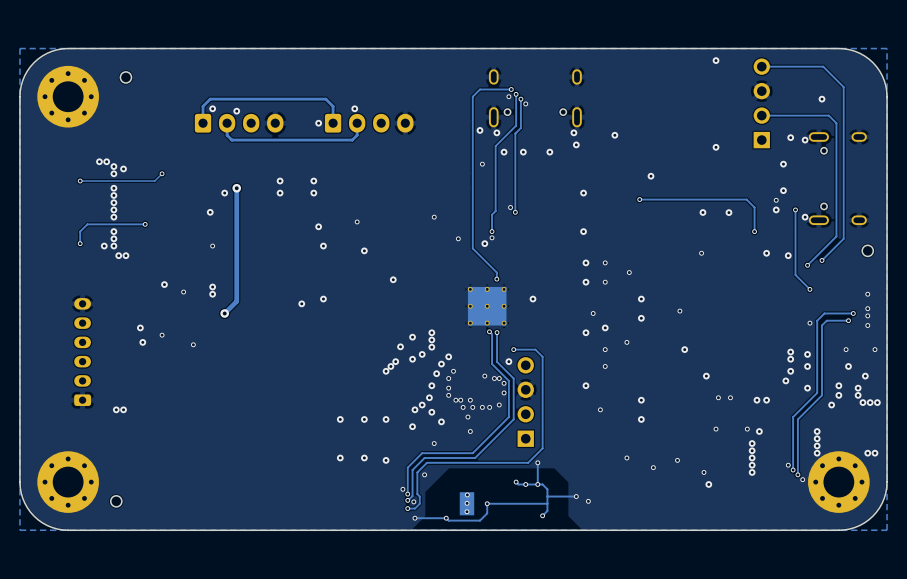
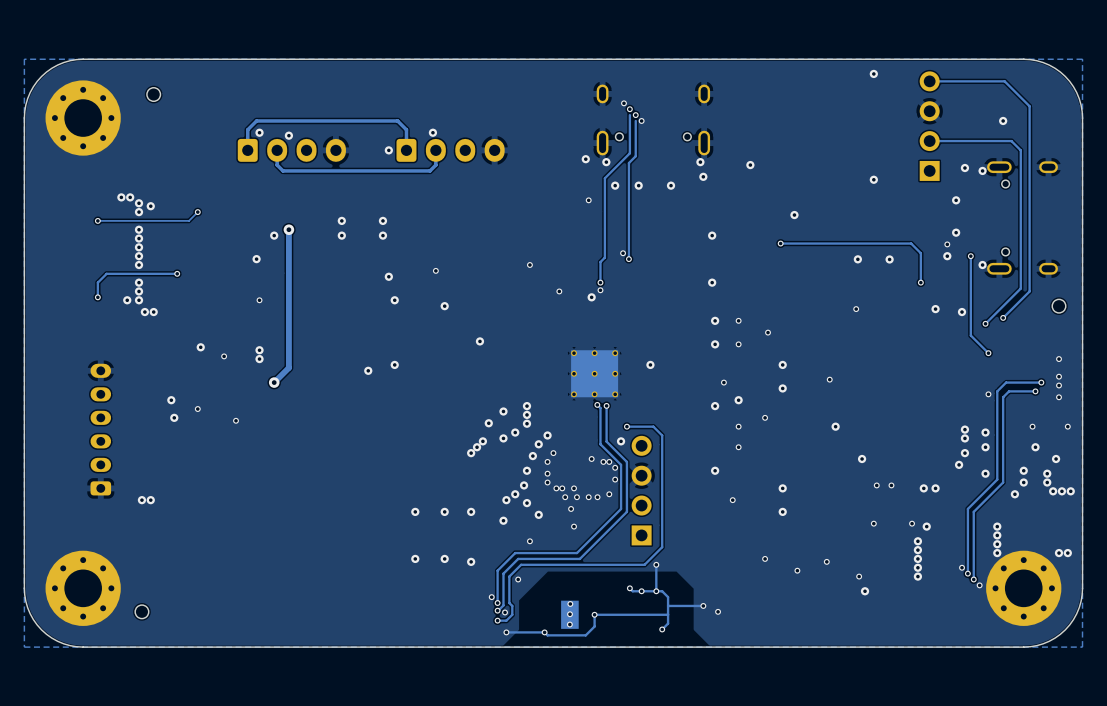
via: none -> (623, 103)
track: (511, 89) (479, 89) (472, 96) (472, 248) (496, 272) (496, 279) -> none
via: (511, 89) -> none
via: none -> (629, 109)
via: (516, 94) -> none
via: none -> (635, 115)
via: (508, 96) -> none
via: (520, 99) -> none
via: none -> (641, 120)
via: (525, 103) -> none
via: (496, 279) -> none

